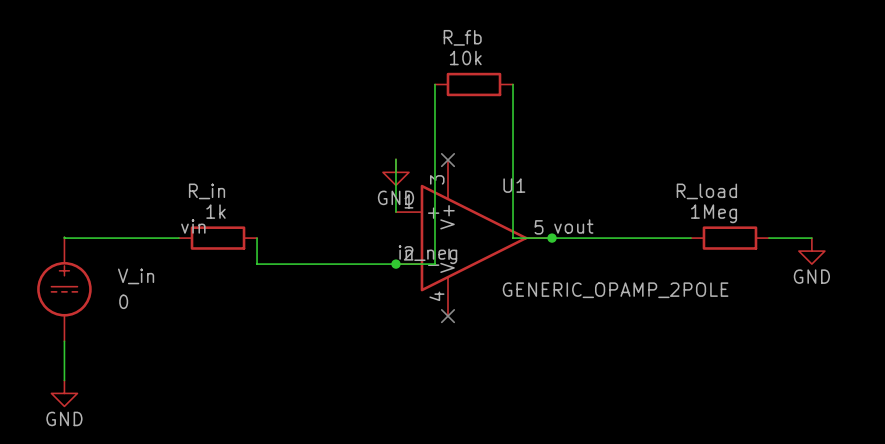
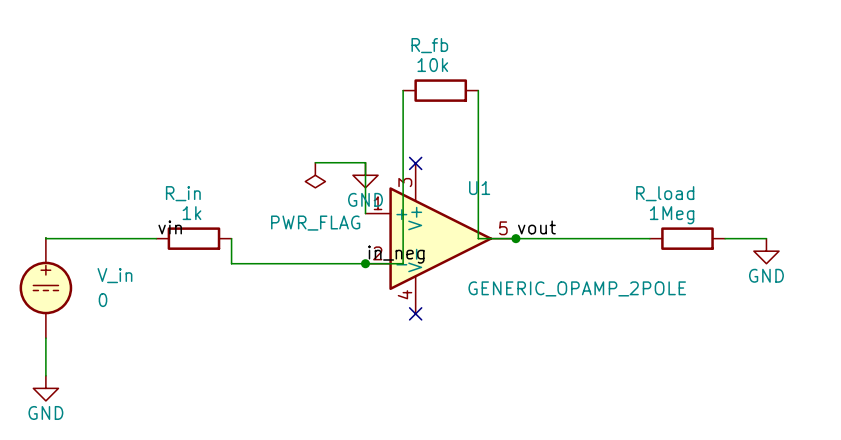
wire: none -> (315, 162) (365, 162)
power symbol: none -> PWR_FLAG (315, 175)

